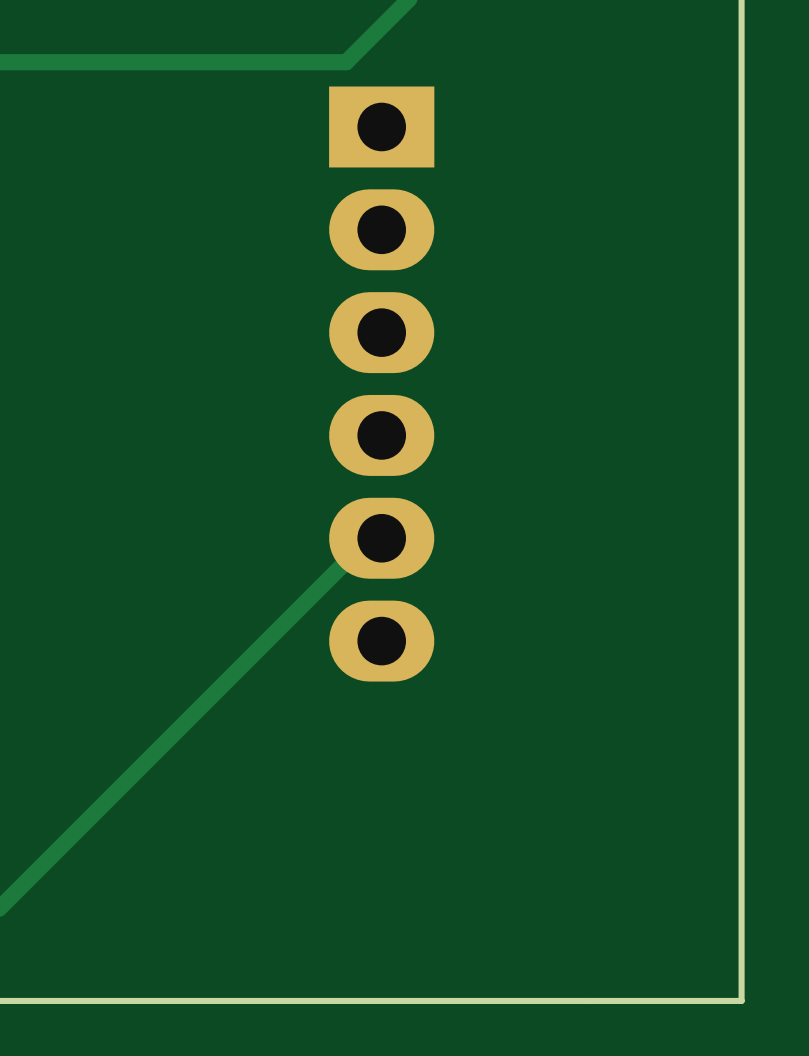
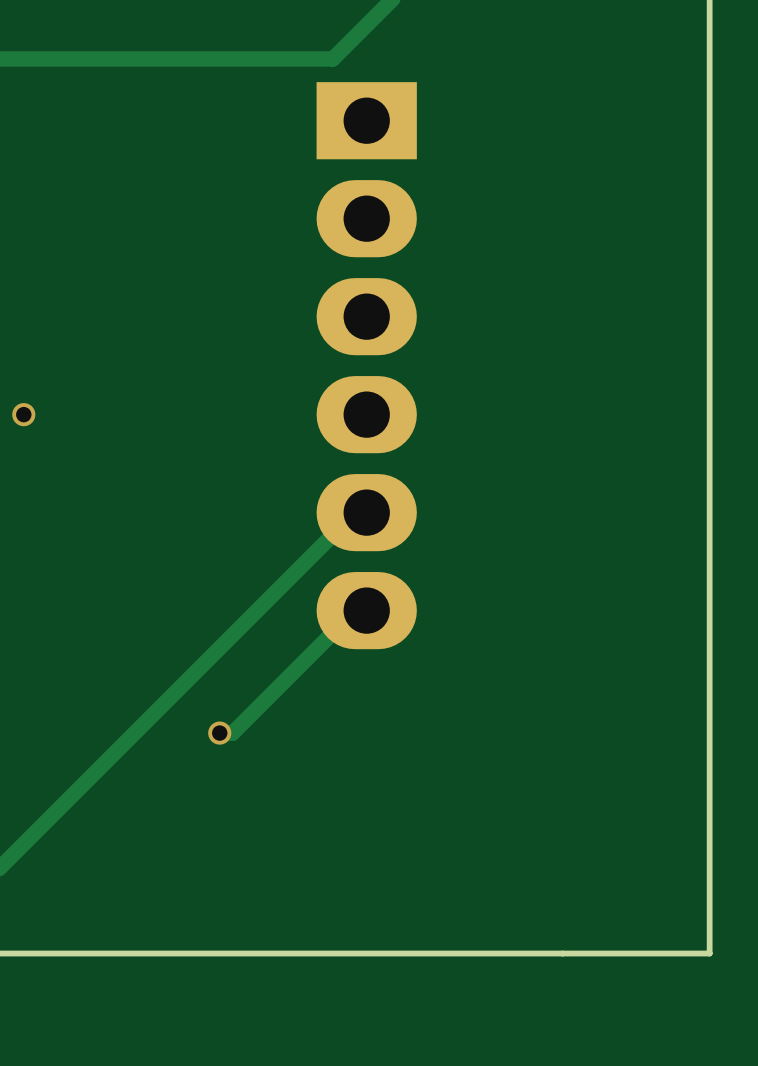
via: none -> (23, 414)
track: none -> (355, 610) (232, 733) (219, 733)
via: none -> (219, 733)

